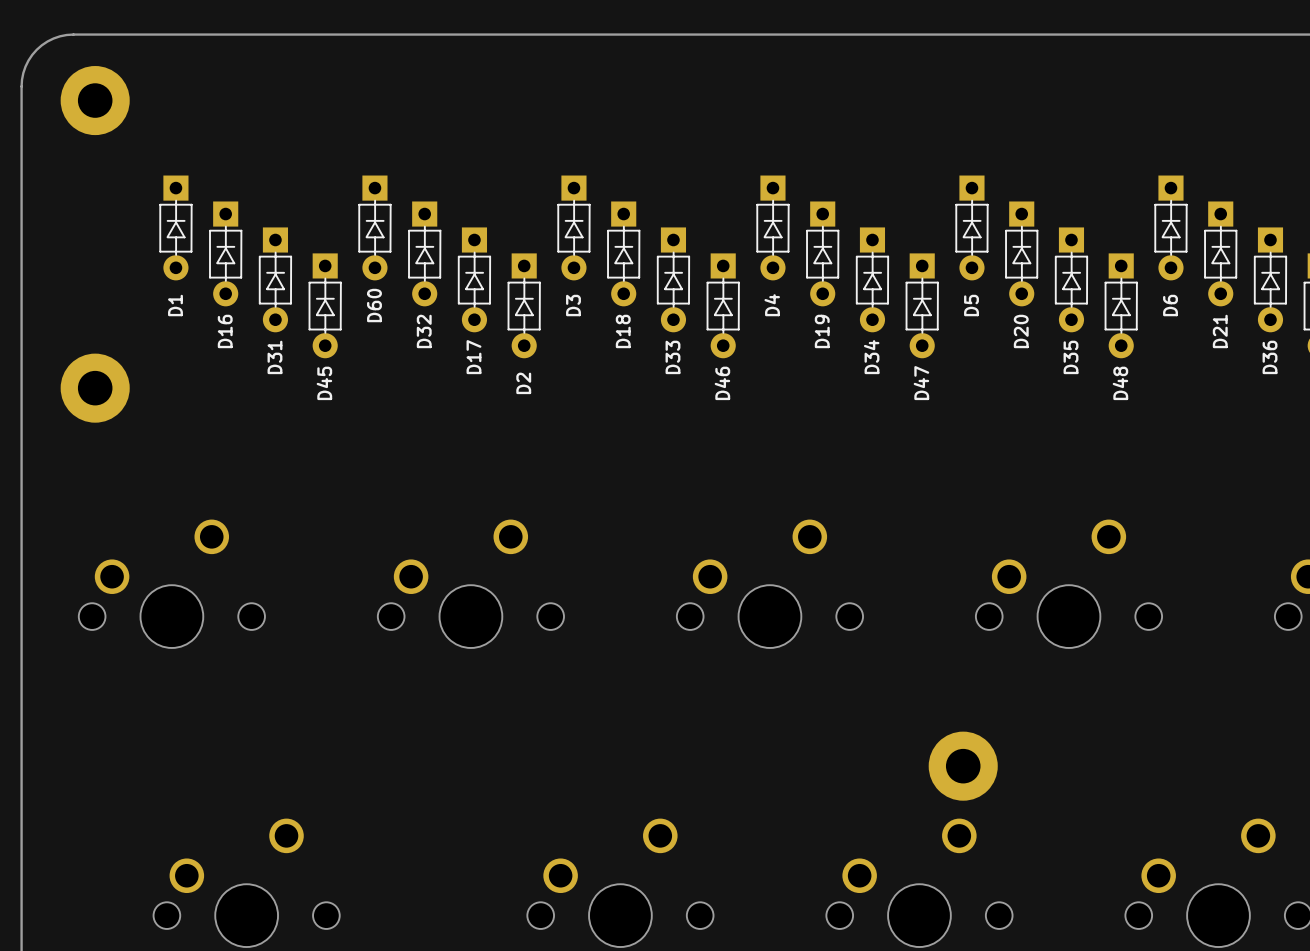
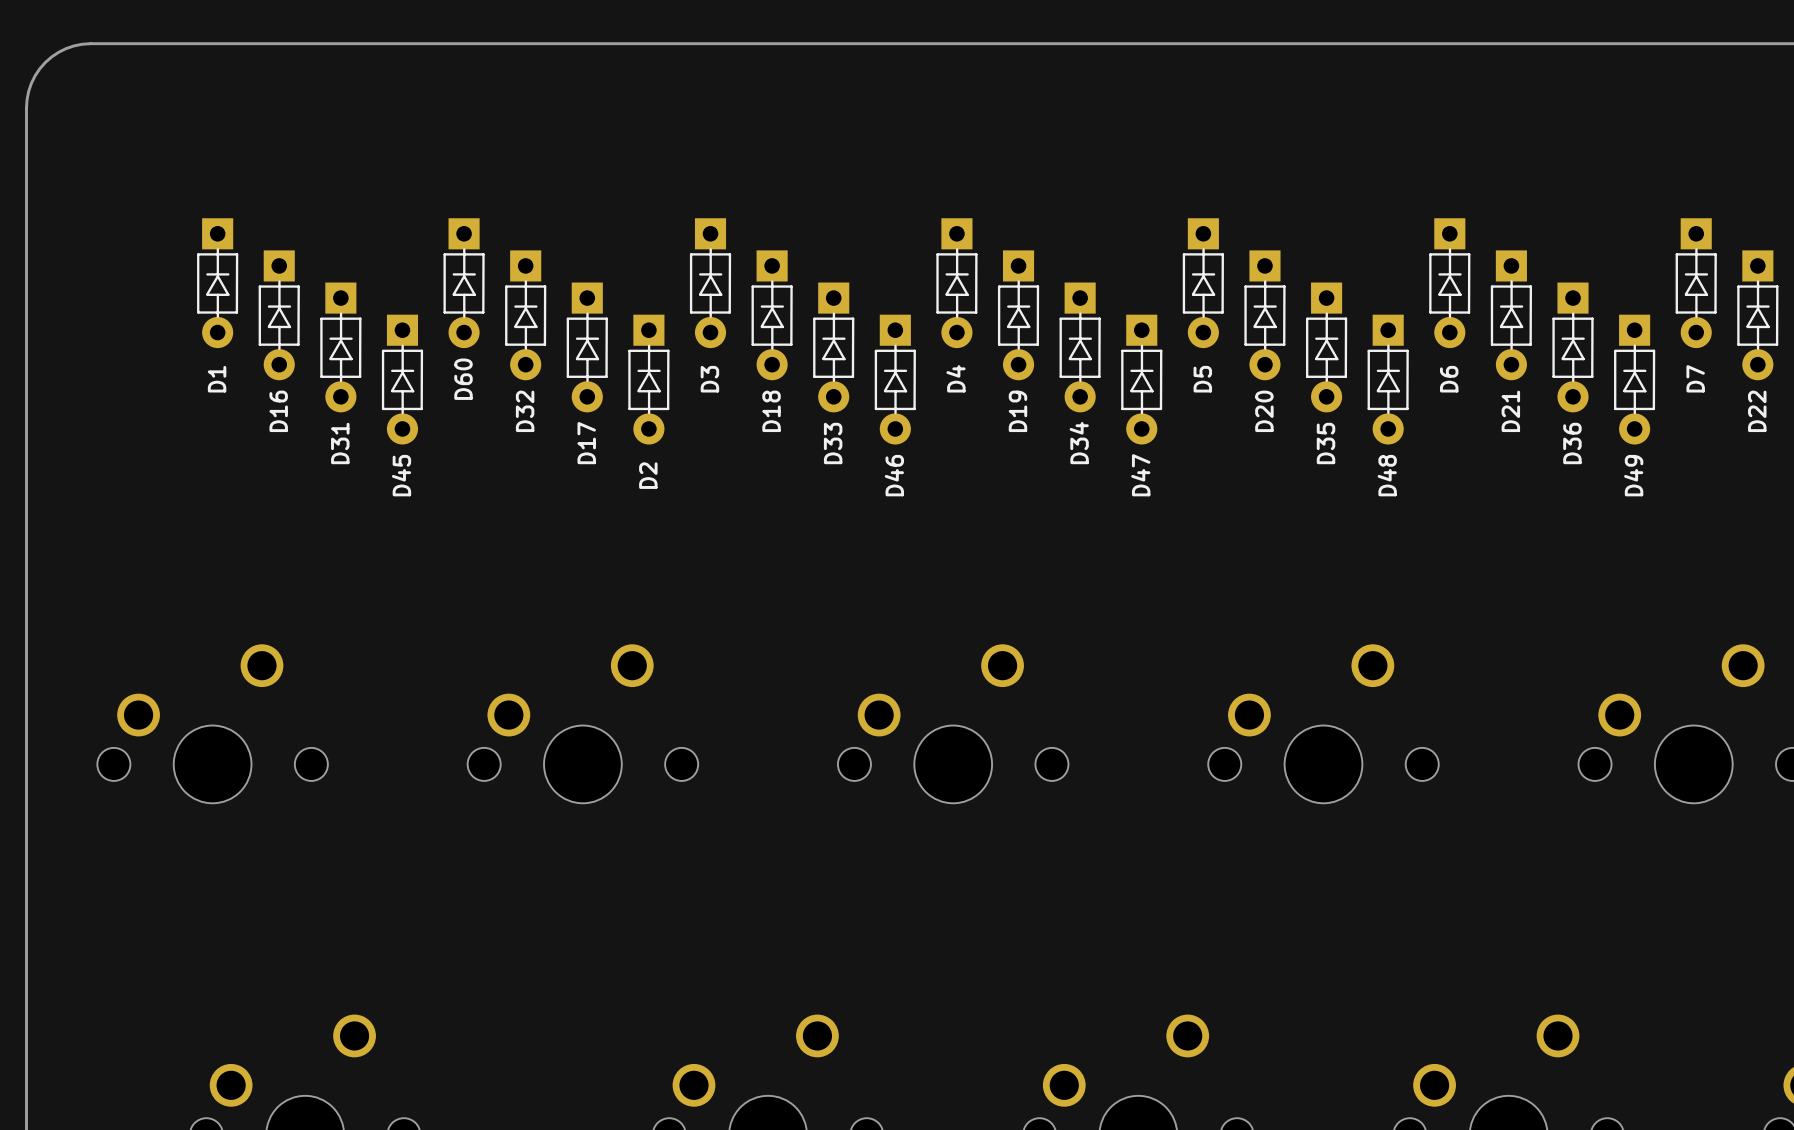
part: (95, 100) -> none
part: (95, 388) -> none
part: (963, 766) -> none

